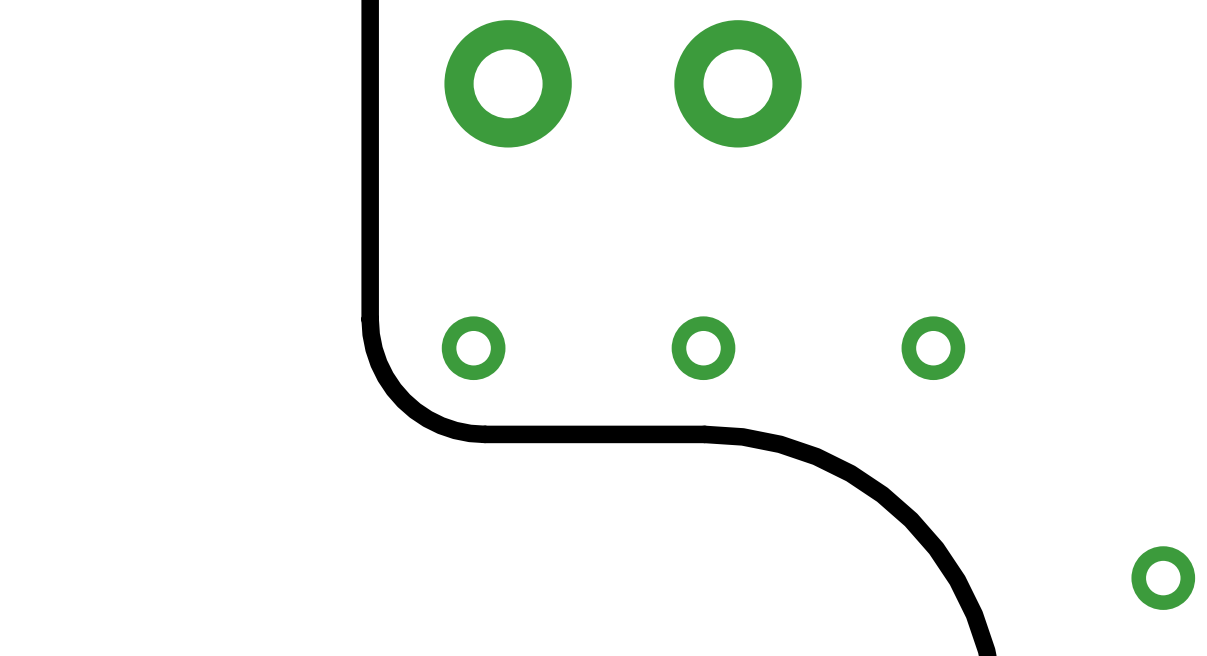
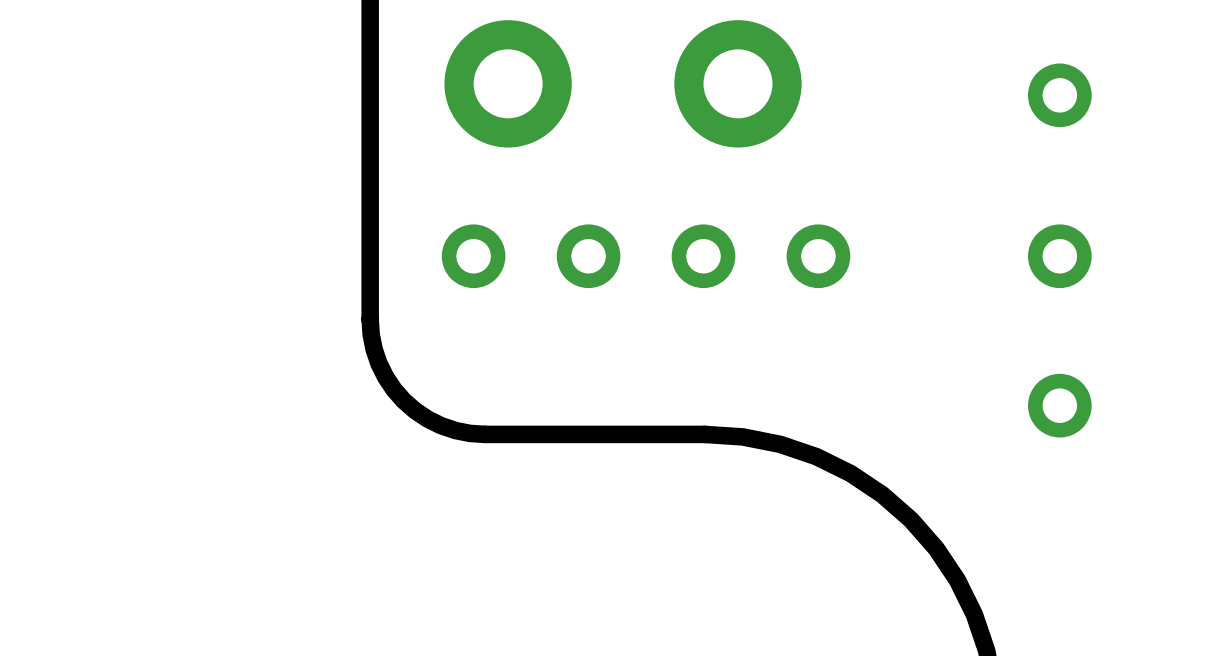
via: none -> (1059, 95)
via: none -> (473, 256)
via: none -> (588, 256)
via: none -> (703, 256)
via: none -> (818, 256)
via: none -> (1059, 256)
via: (473, 348) -> none
via: (703, 348) -> none
via: (933, 348) -> none
via: none -> (1059, 405)
via: (1163, 578) -> none

